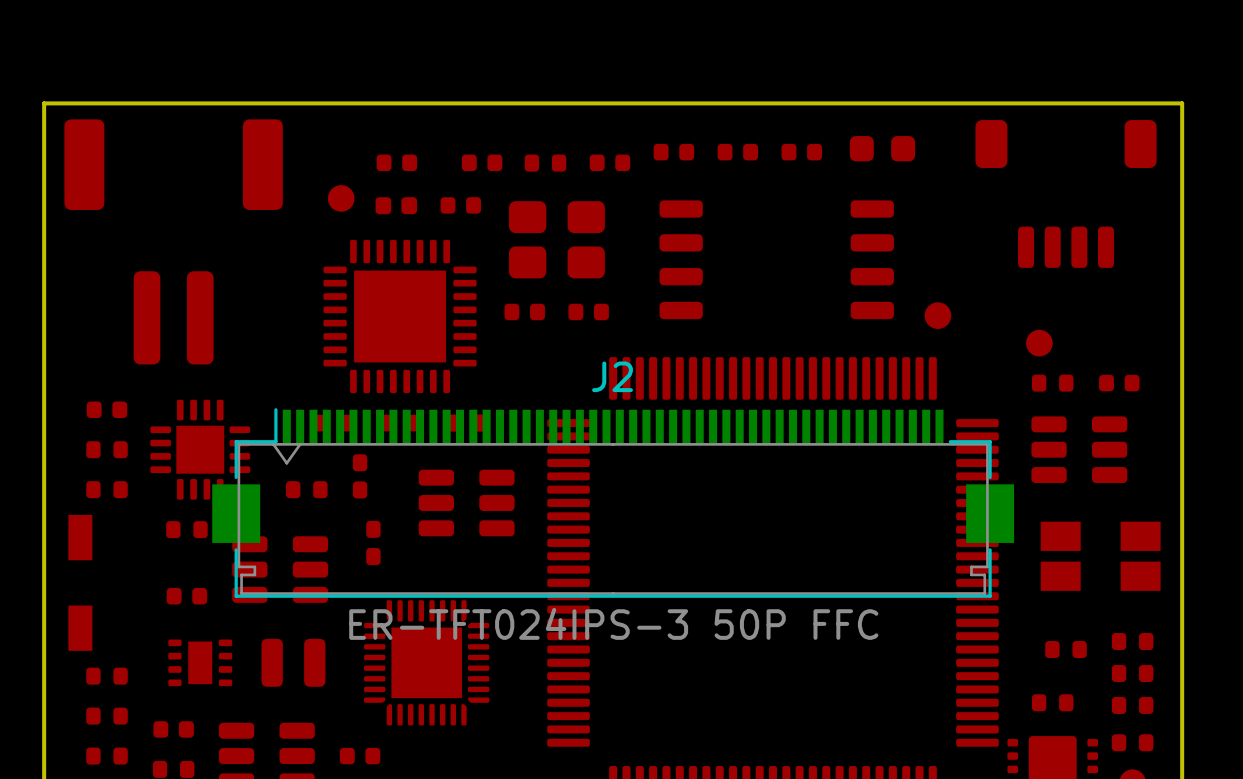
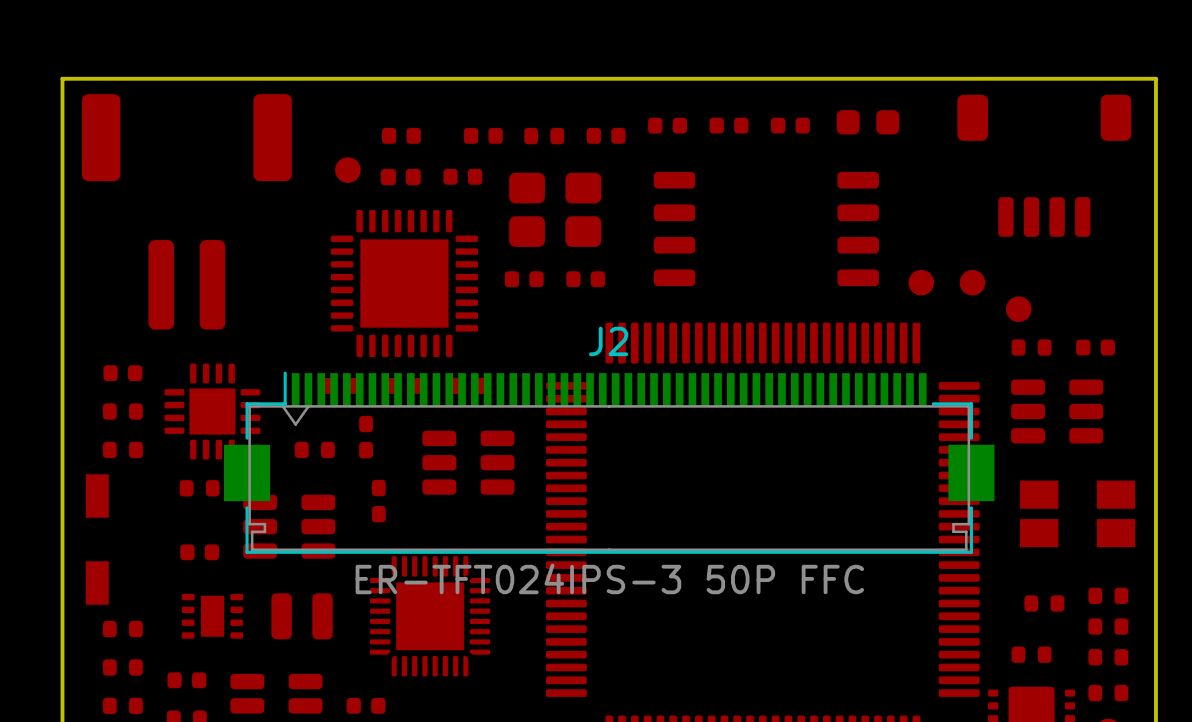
part: none -> (972, 282)

